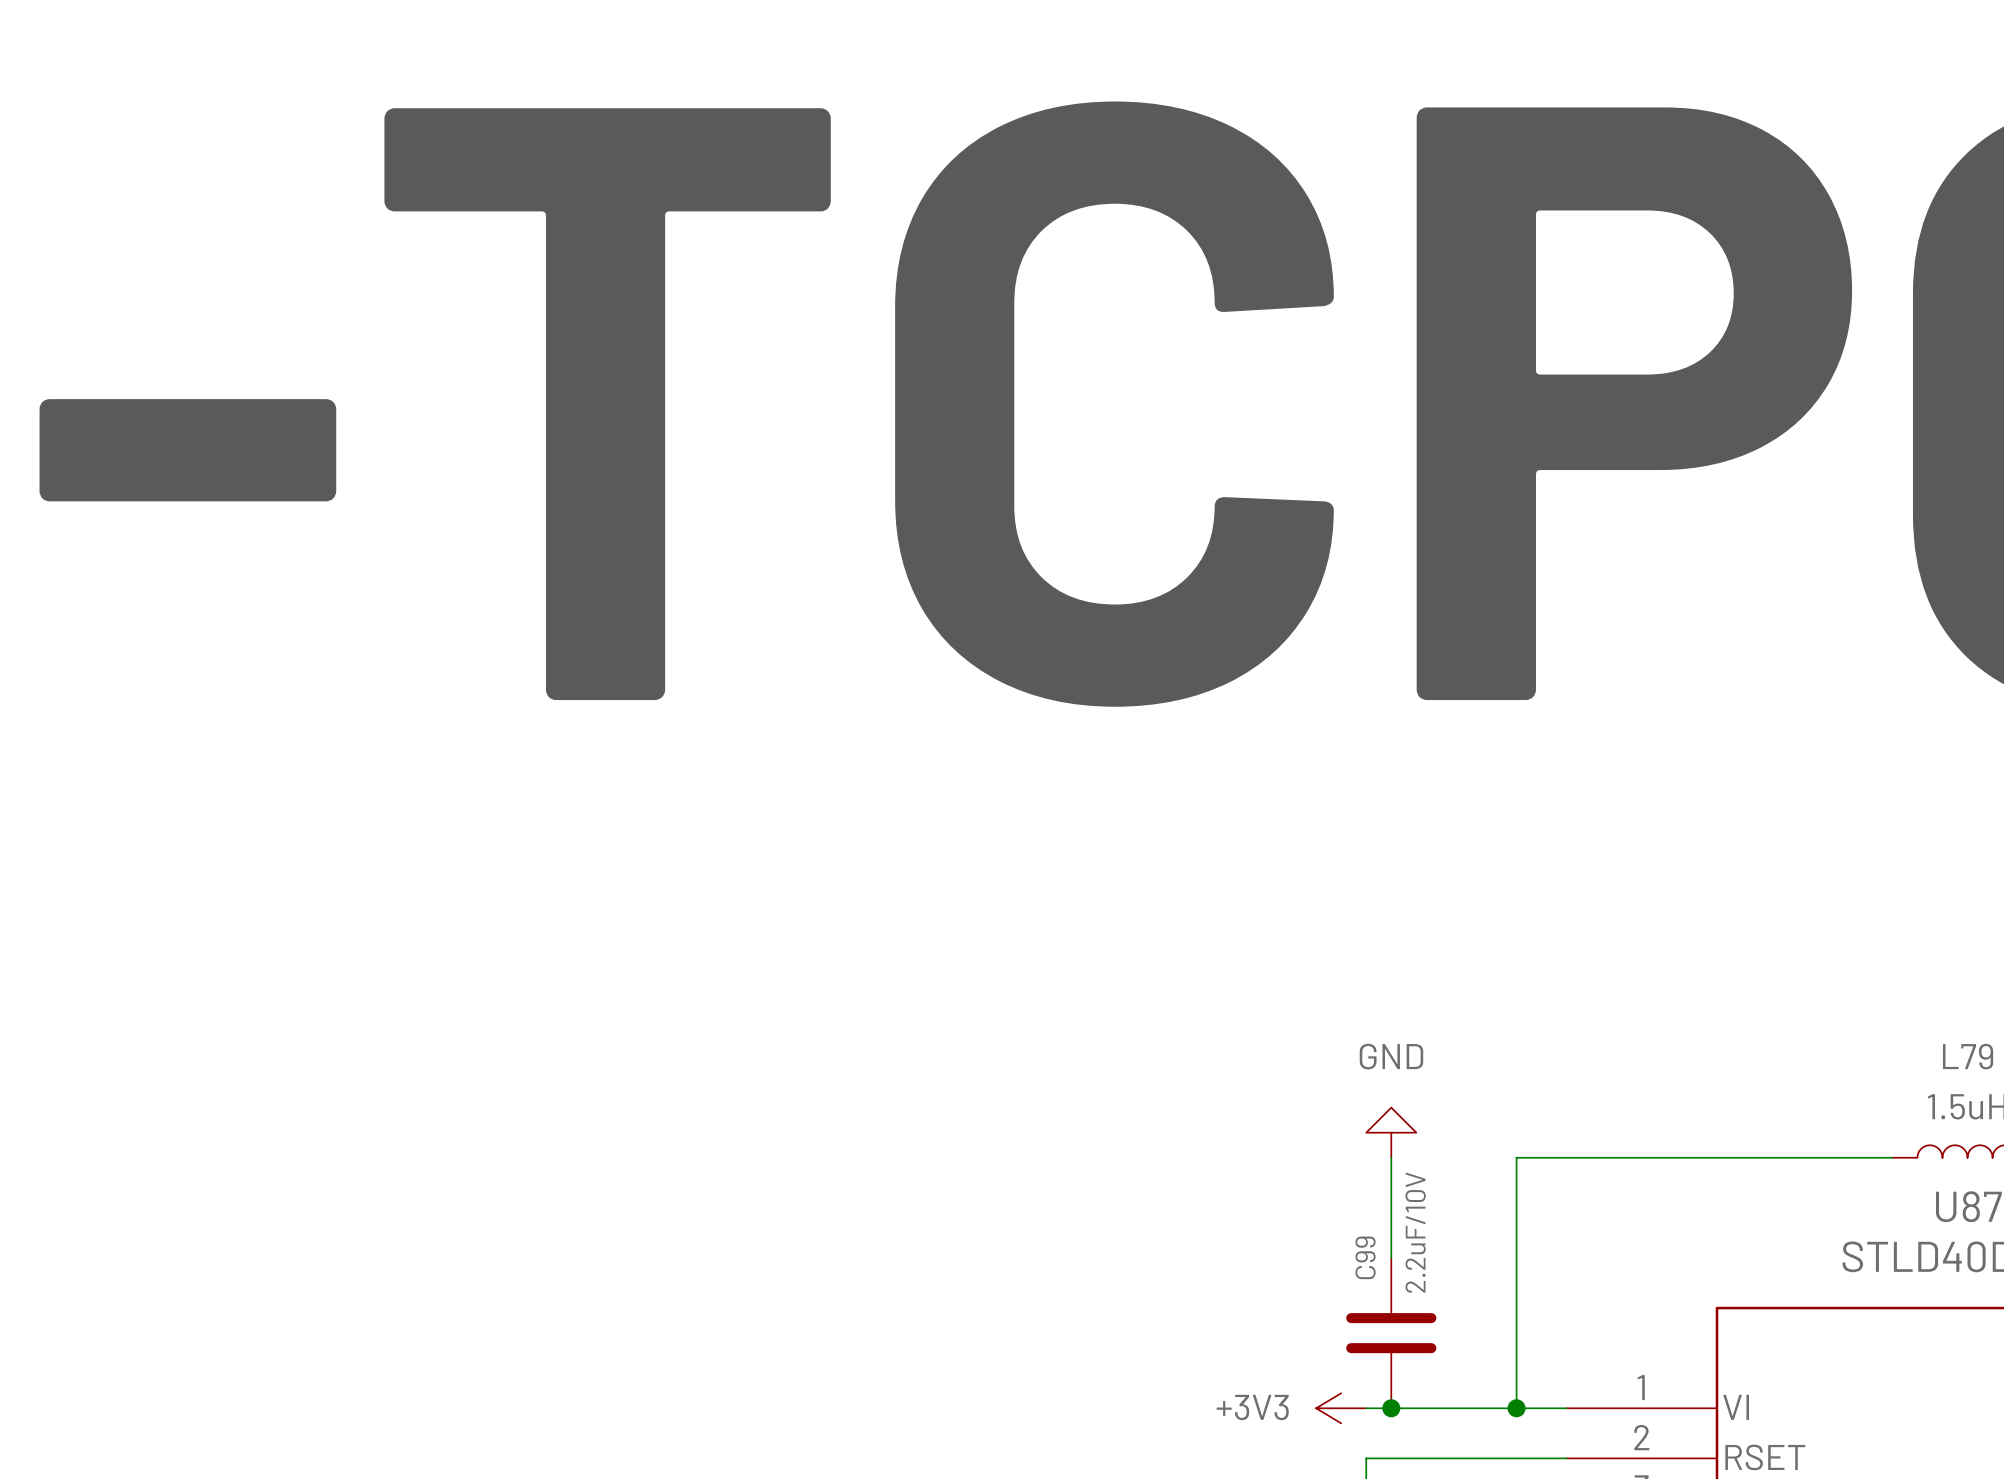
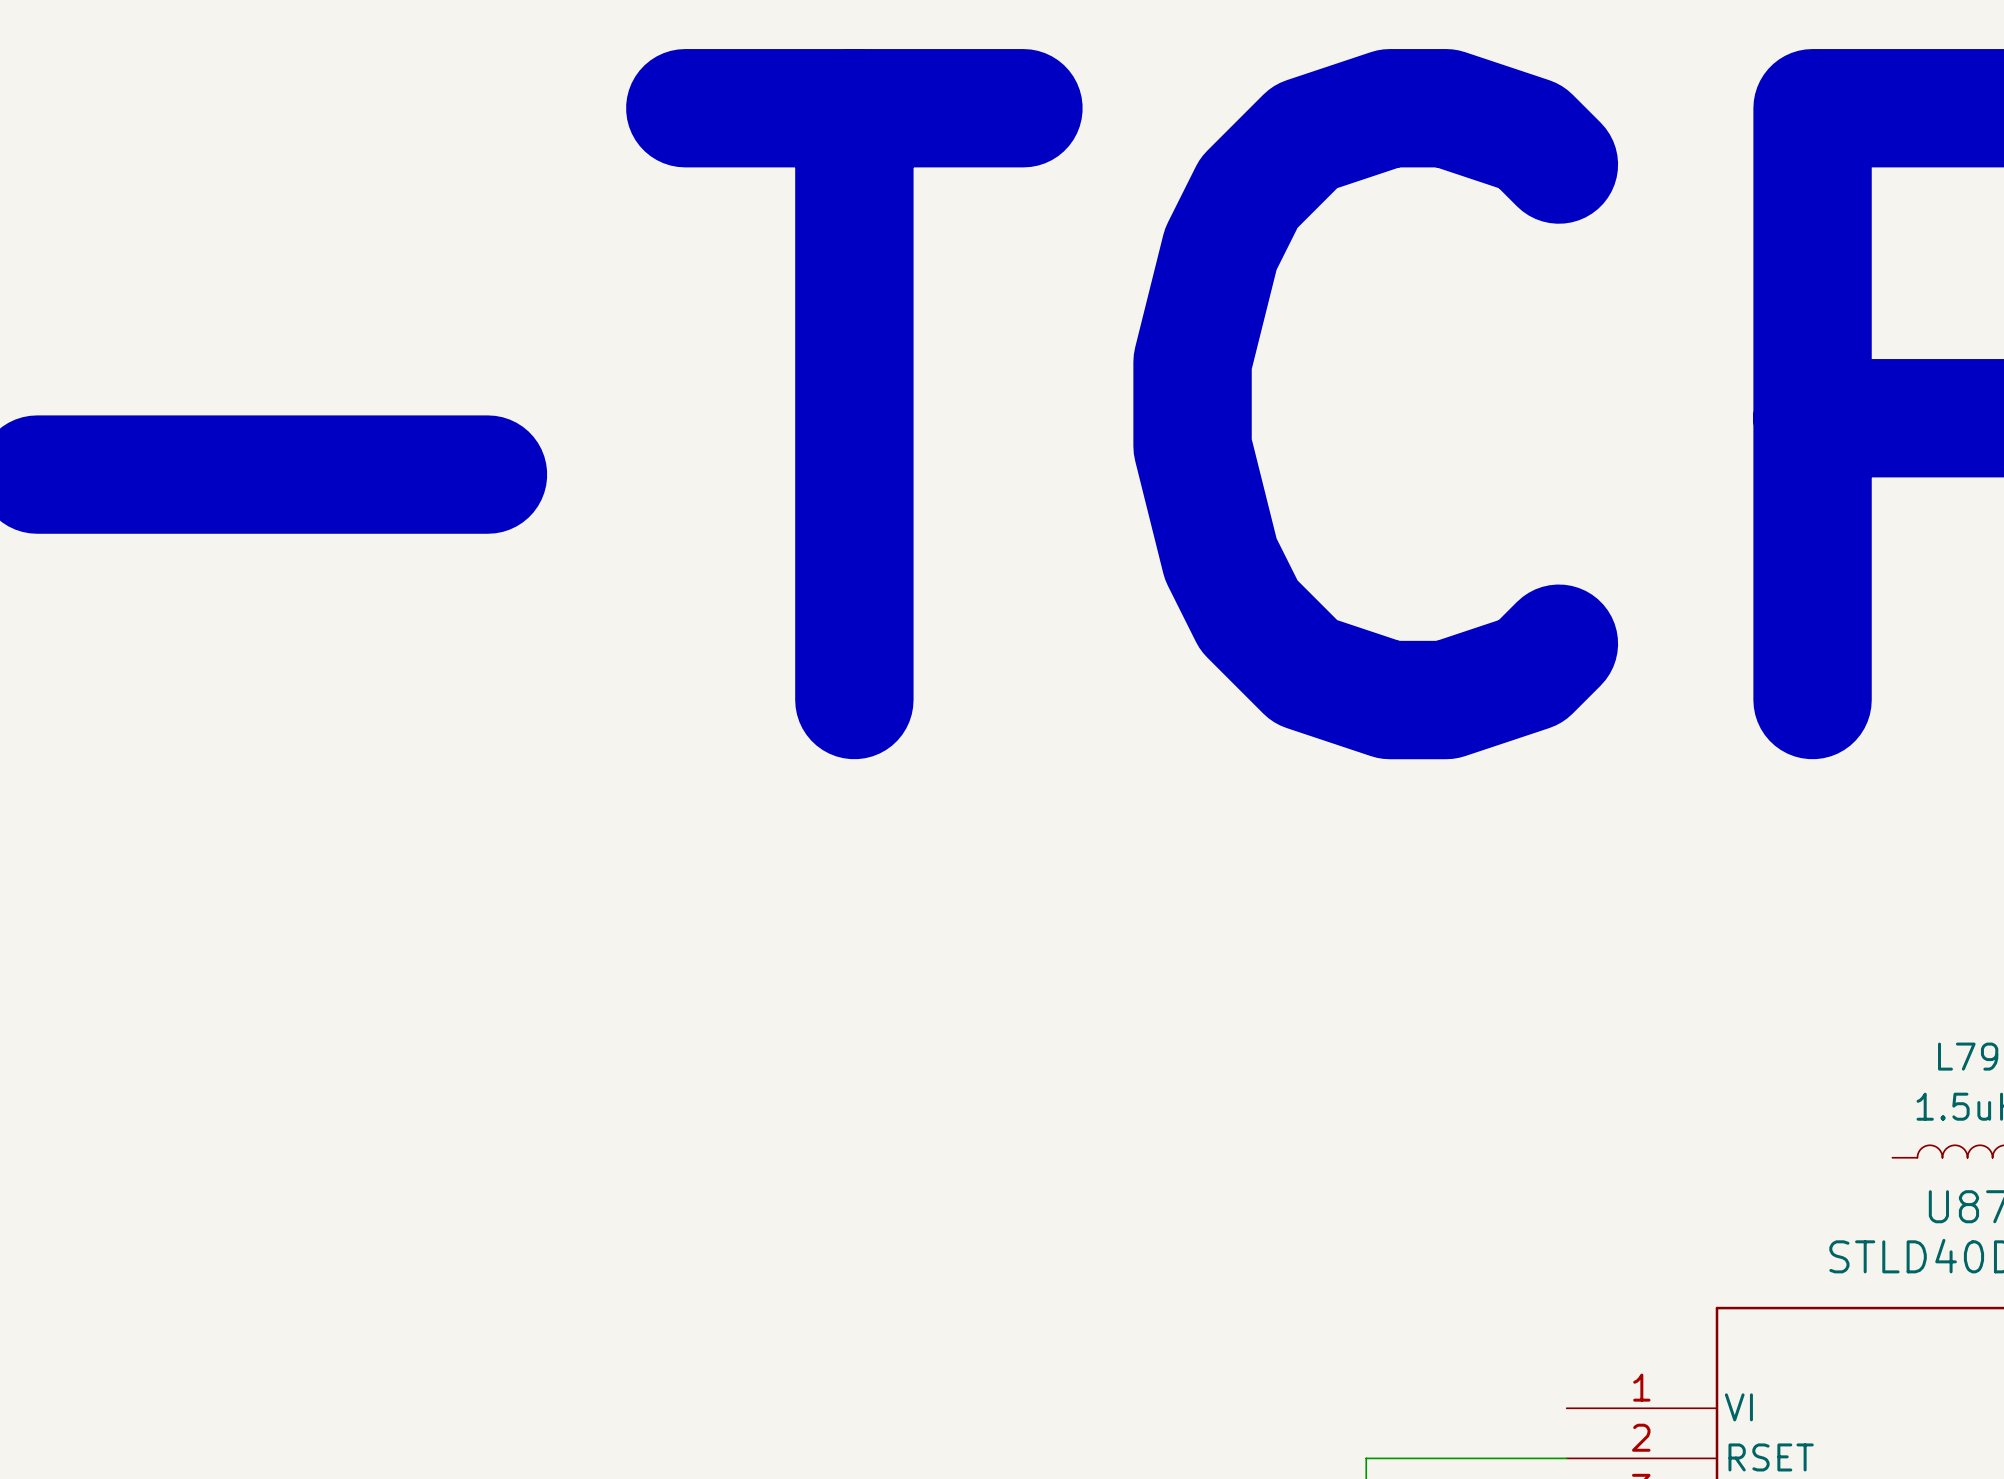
power symbol: GND (1391, 1132) -> none
wire: (1391, 1157) (1391, 1257) -> none
wire: (1892, 1157) (1516, 1157) (1516, 1408) -> none
C99: 2.2uF/10V (1391, 1333) -> none
power symbol: +3V3 (1341, 1408) -> none
wire: (1366, 1408) (1566, 1408) -> none
junction: (1391, 1408) -> none
junction: (1516, 1408) -> none

